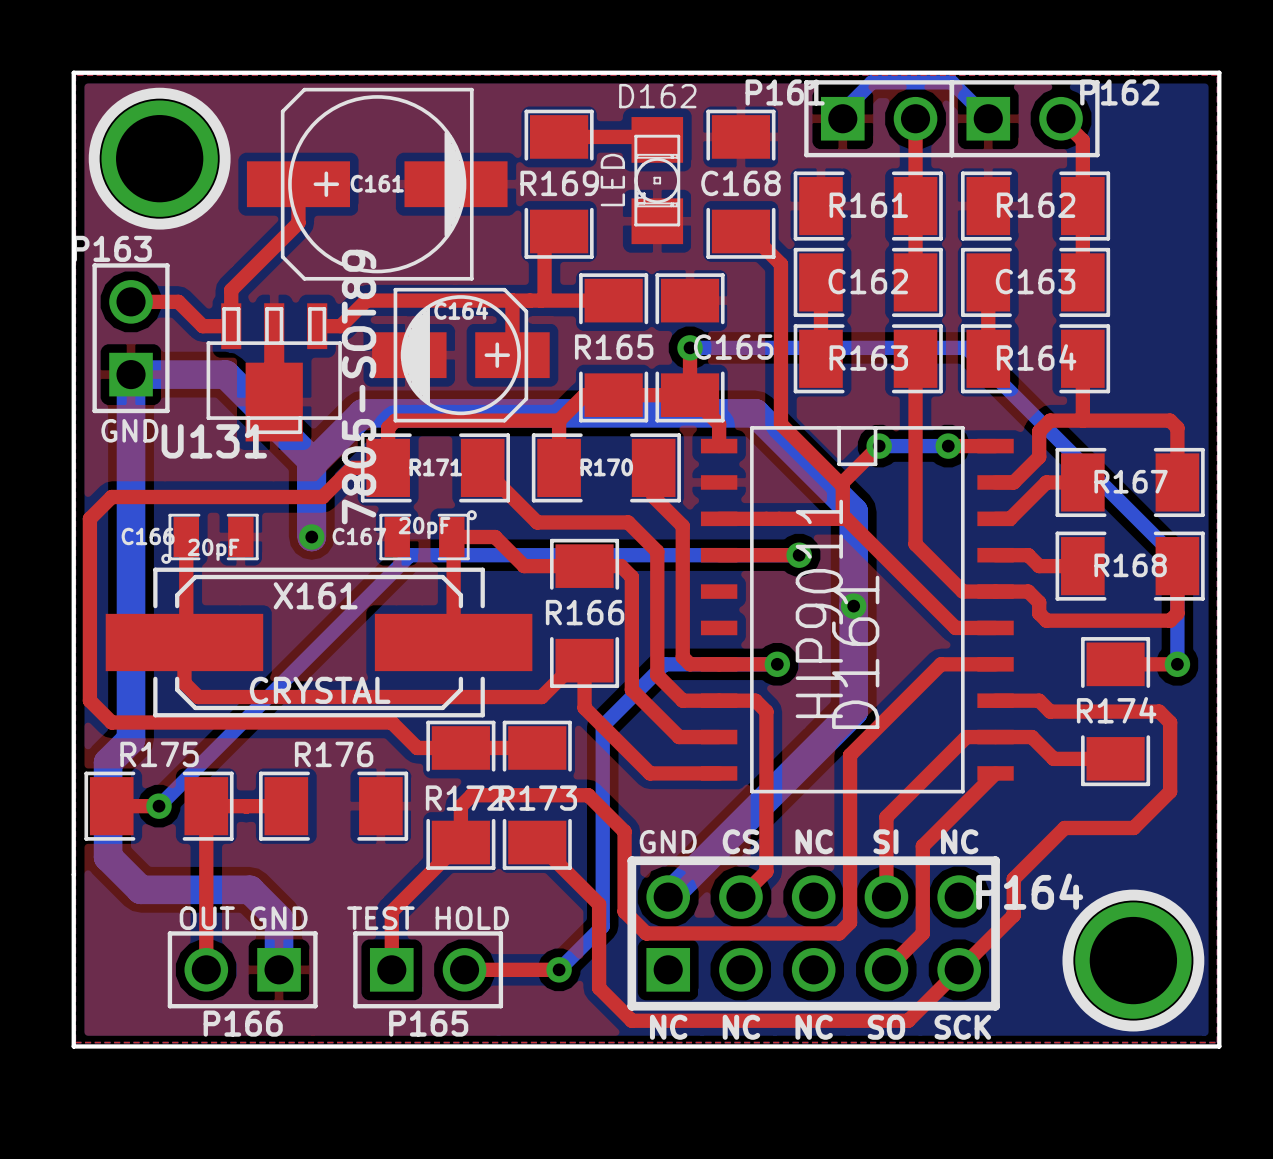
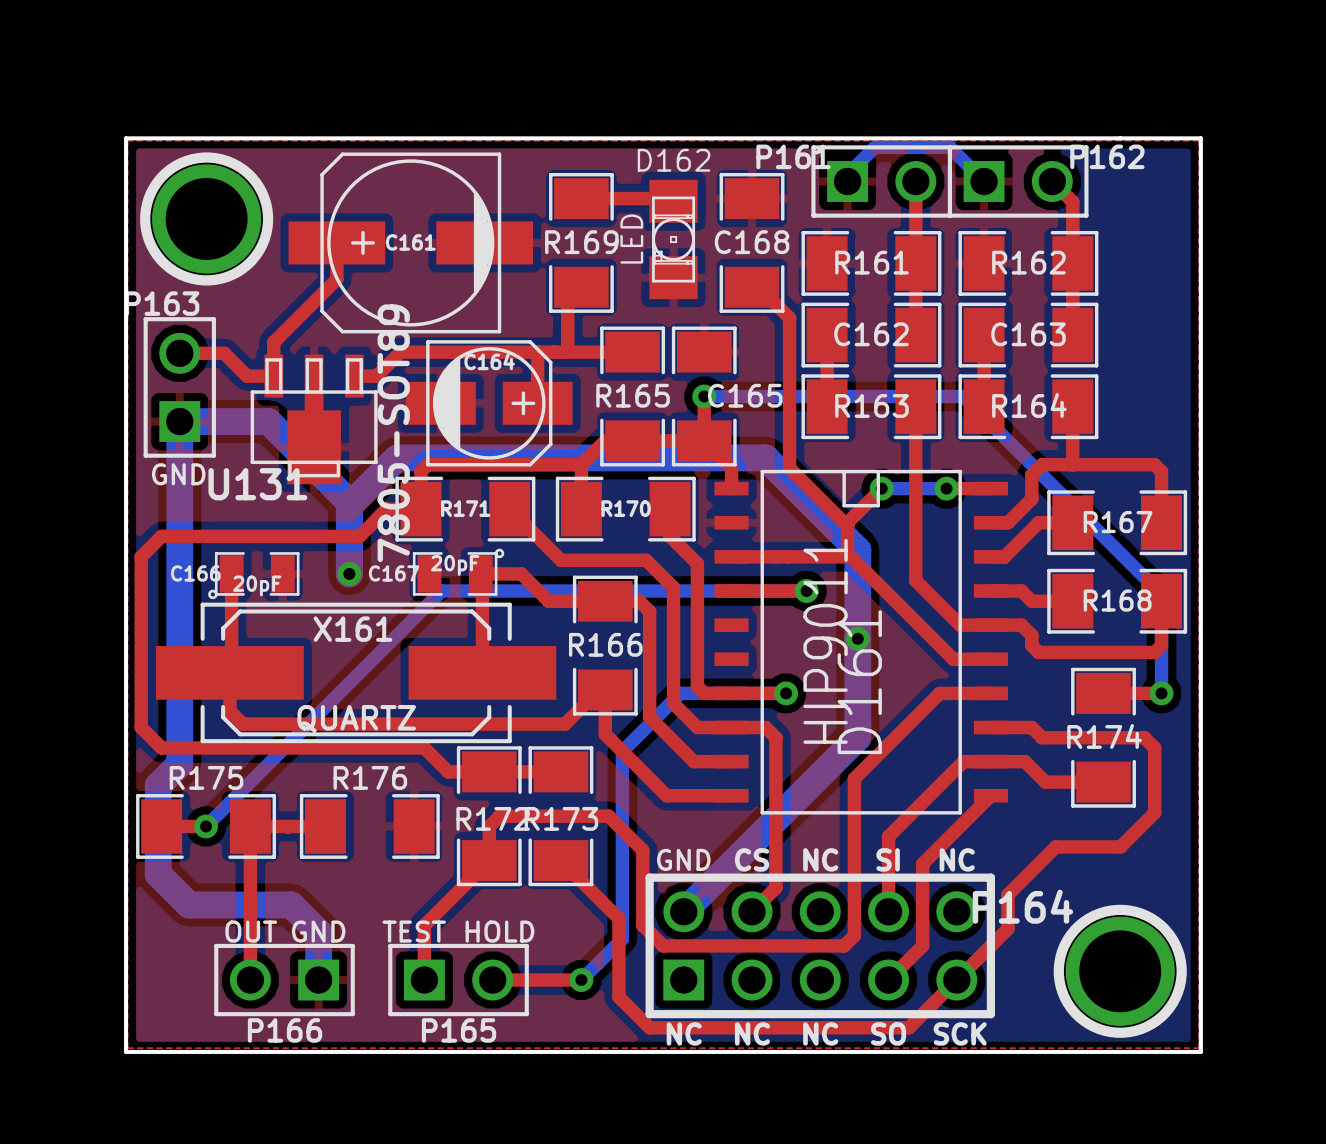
X161 value: CRYSTAL (320, 690) -> QUARTZ (356, 718)

